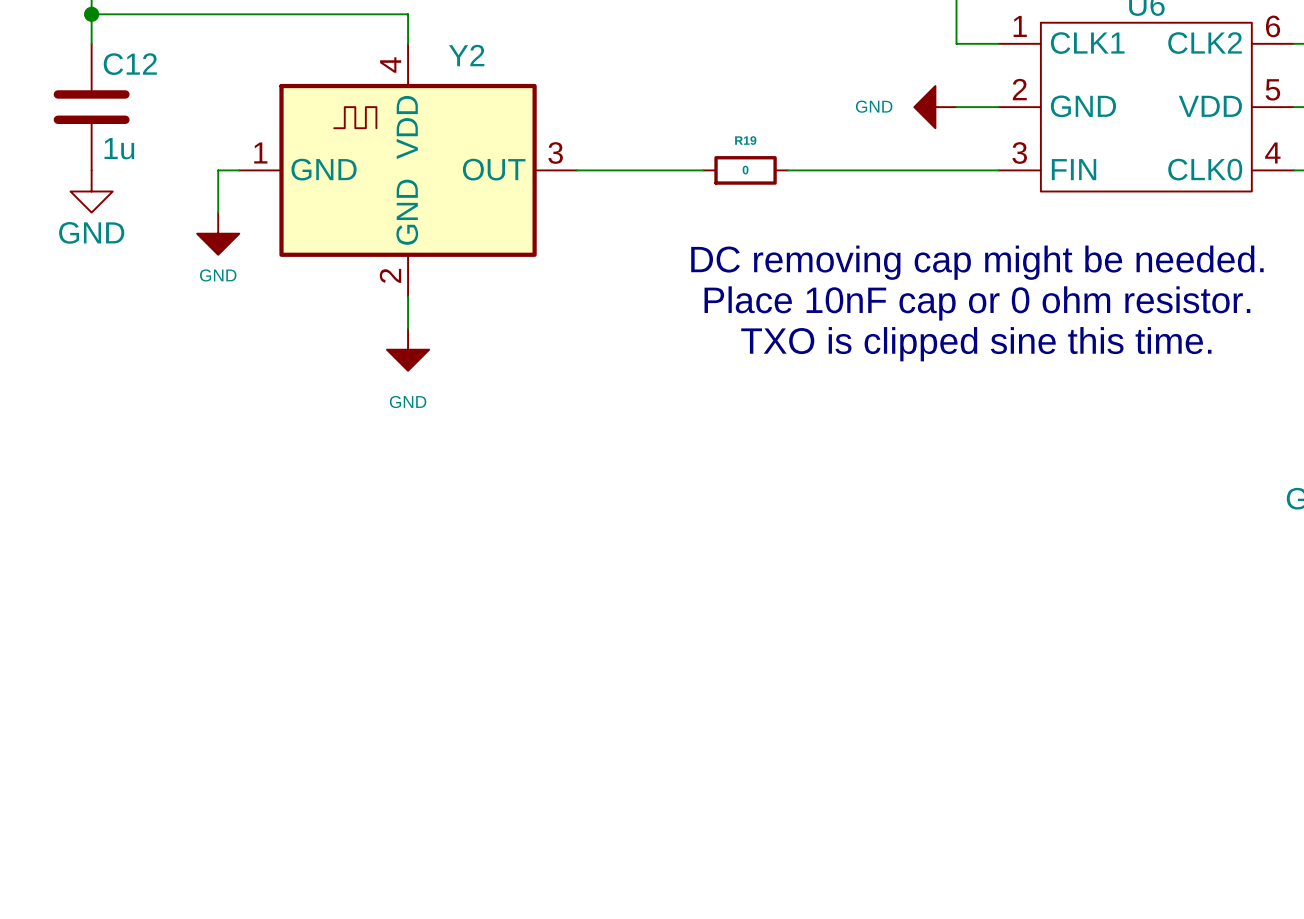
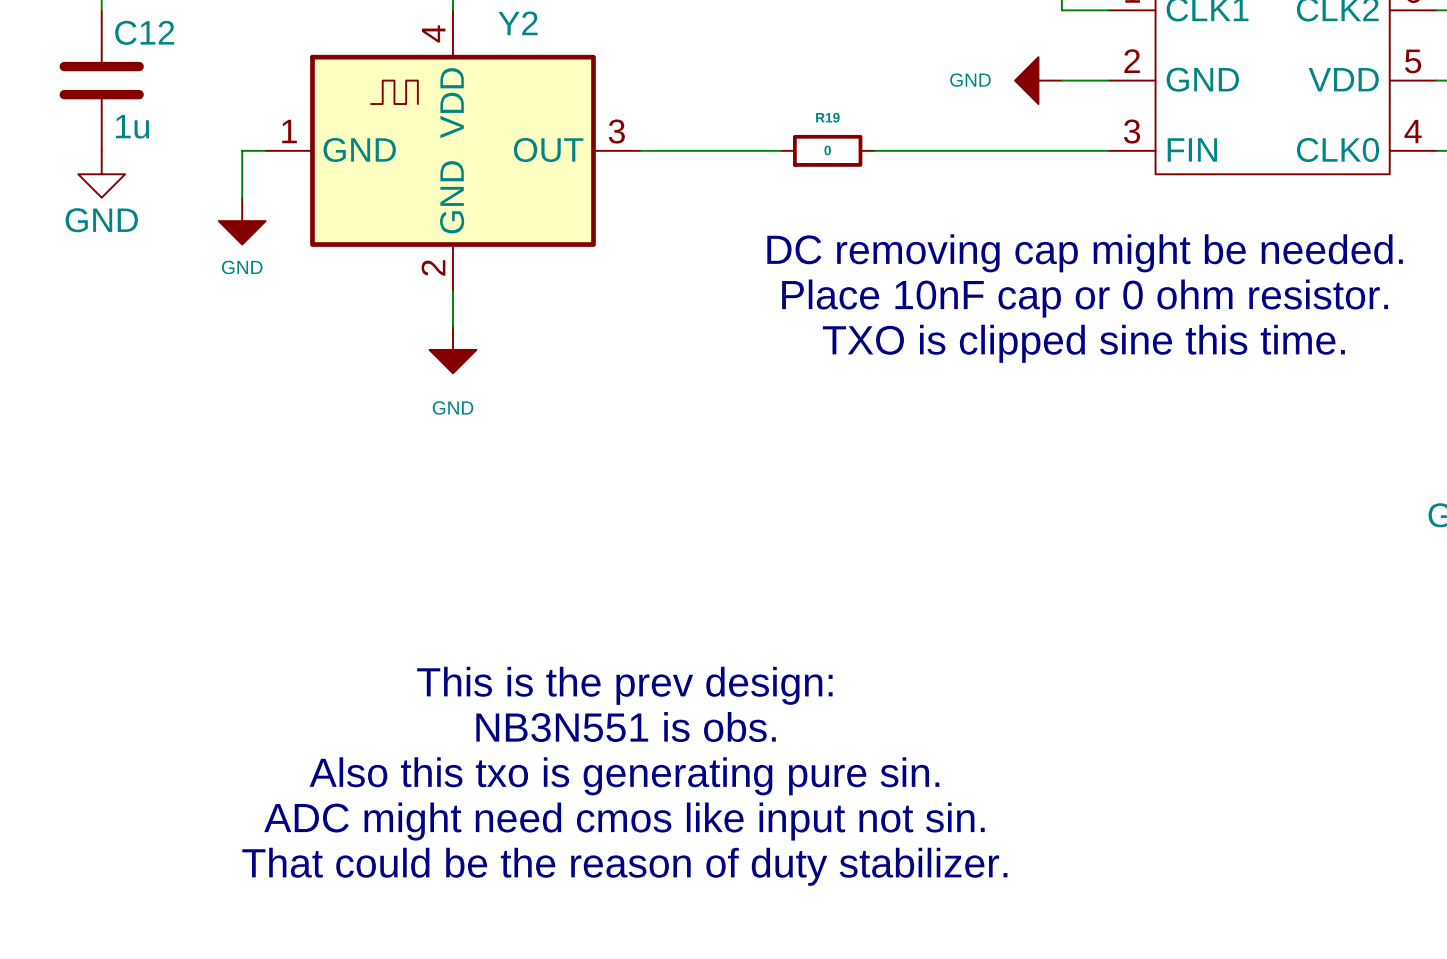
text: none -> This is the prev design: (624, 685)
text: none -> NB3N551 is obs. (626, 727)
text: none -> Also this txo is generating pure sin. (624, 776)
text: none -> ADC might need cmos like input not sin. (624, 821)
text: none -> That could be the reason of duty stabilizer. (624, 866)

